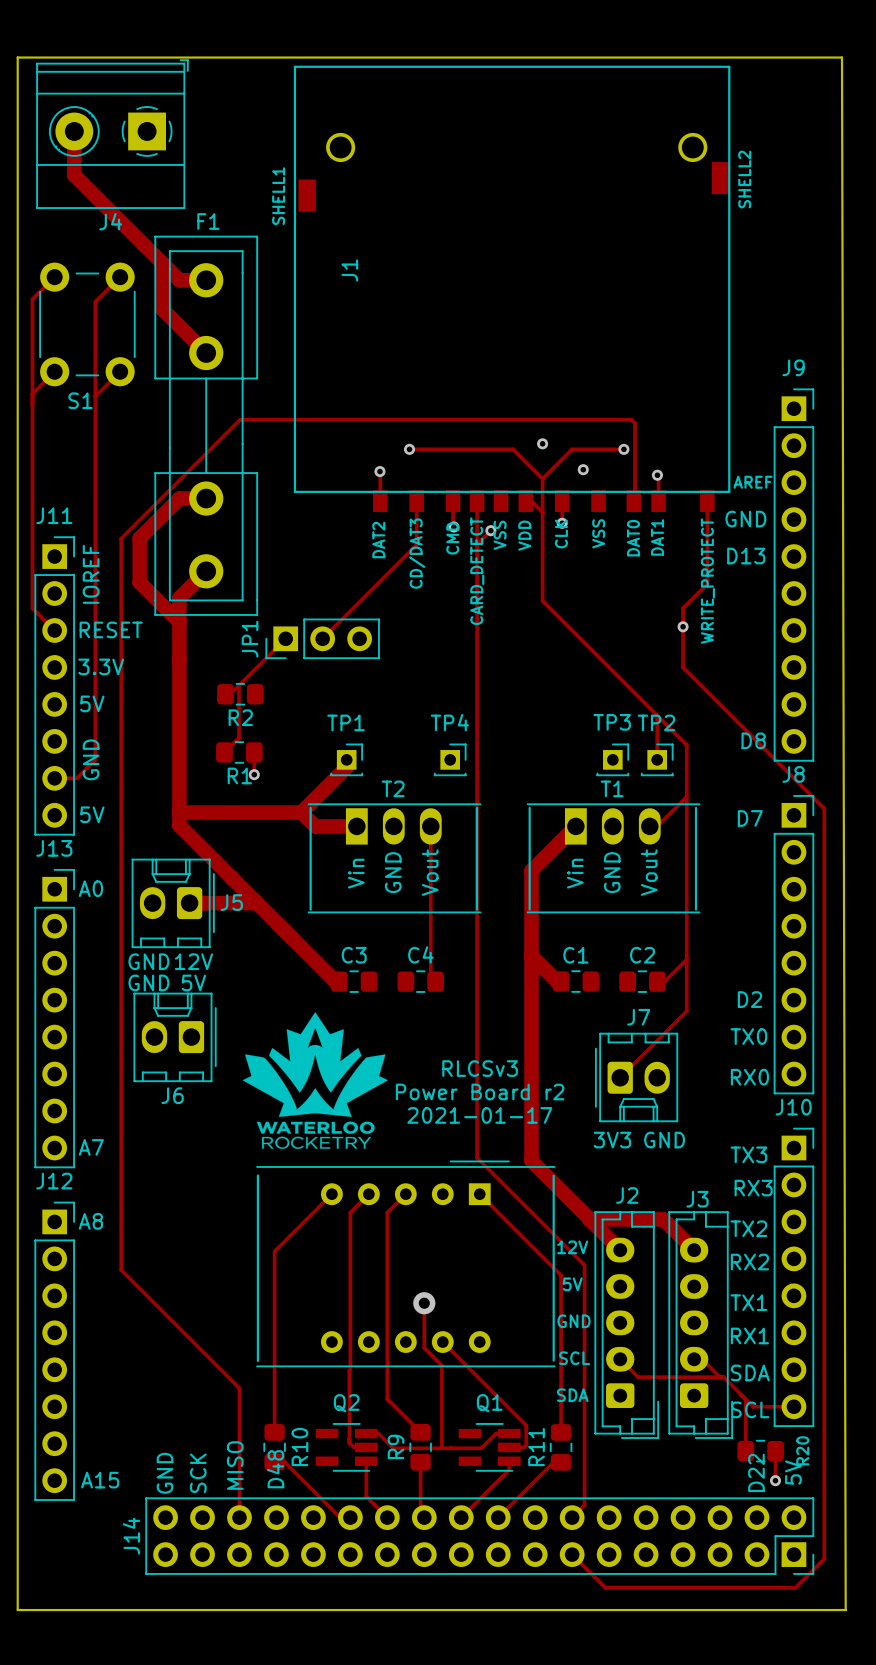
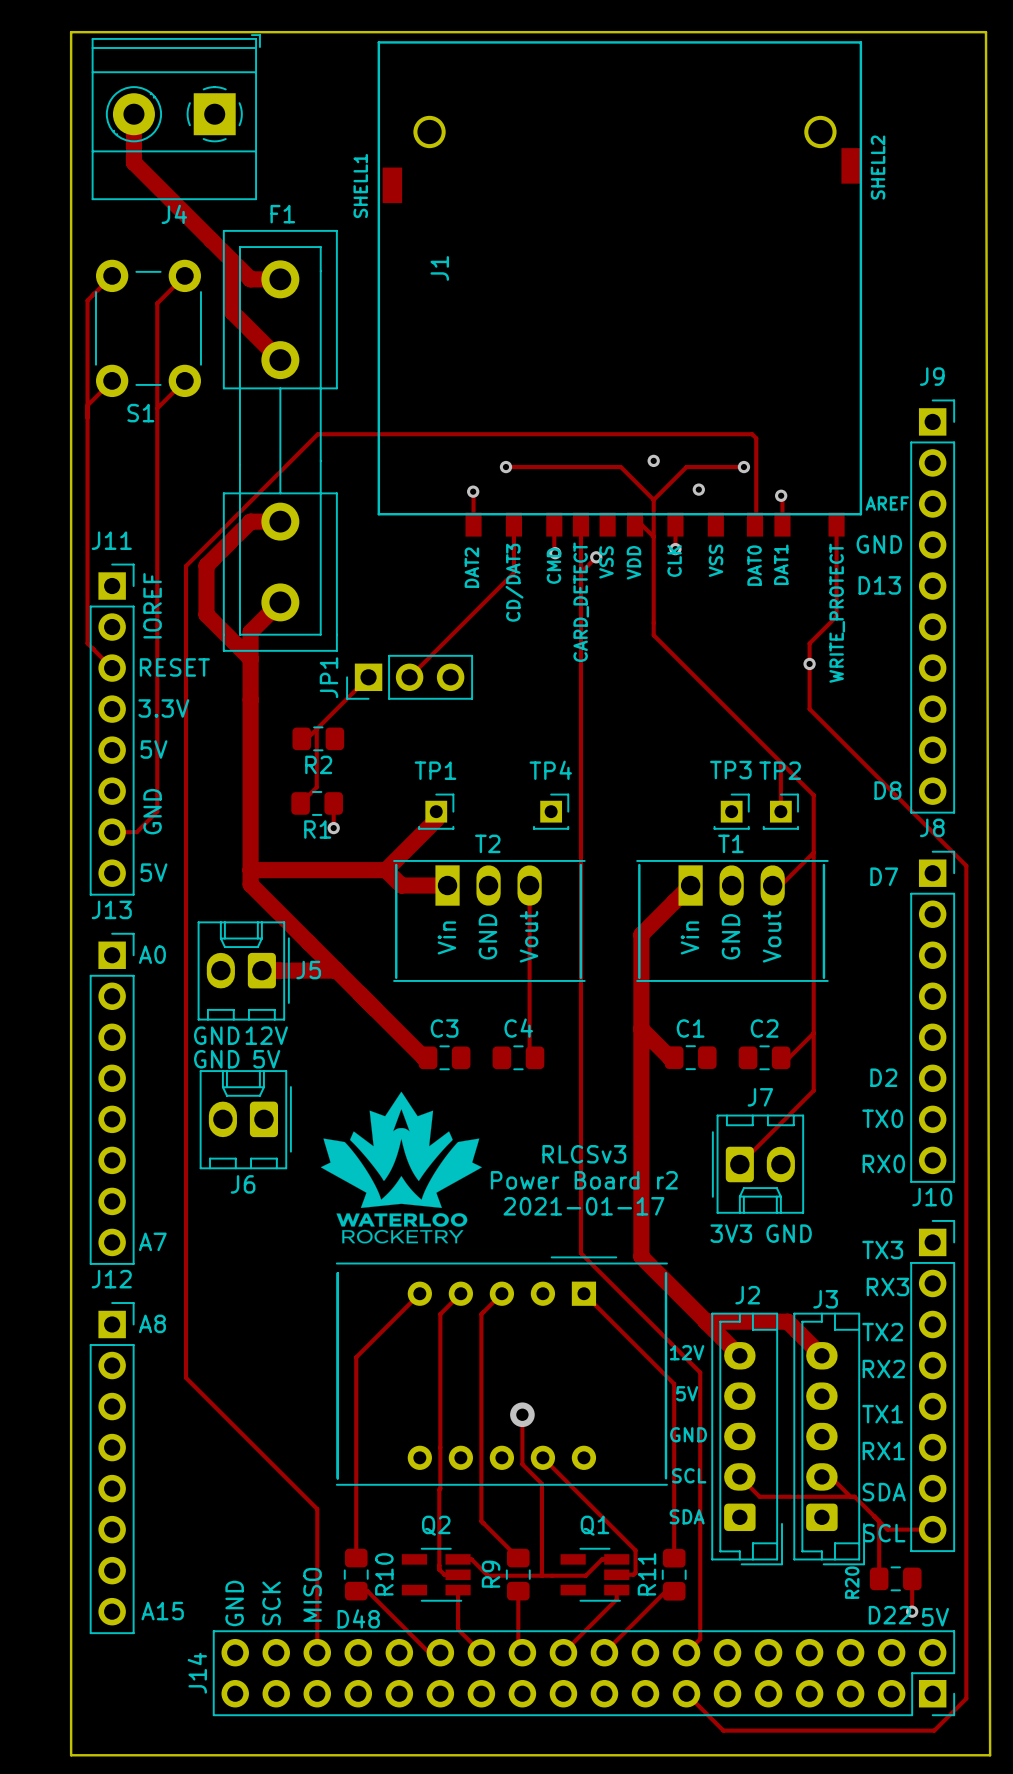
R20 name position: R20 (802, 1450) -> R20 (852, 1582)
J14 text rotation: 0° (275, 1469) -> 90° clockwise (358, 1618)
J14 text rotation: 0° (756, 1472) -> 90° clockwise (889, 1615)
J14 text rotation: 0° (793, 1472) -> 90° clockwise (935, 1617)

